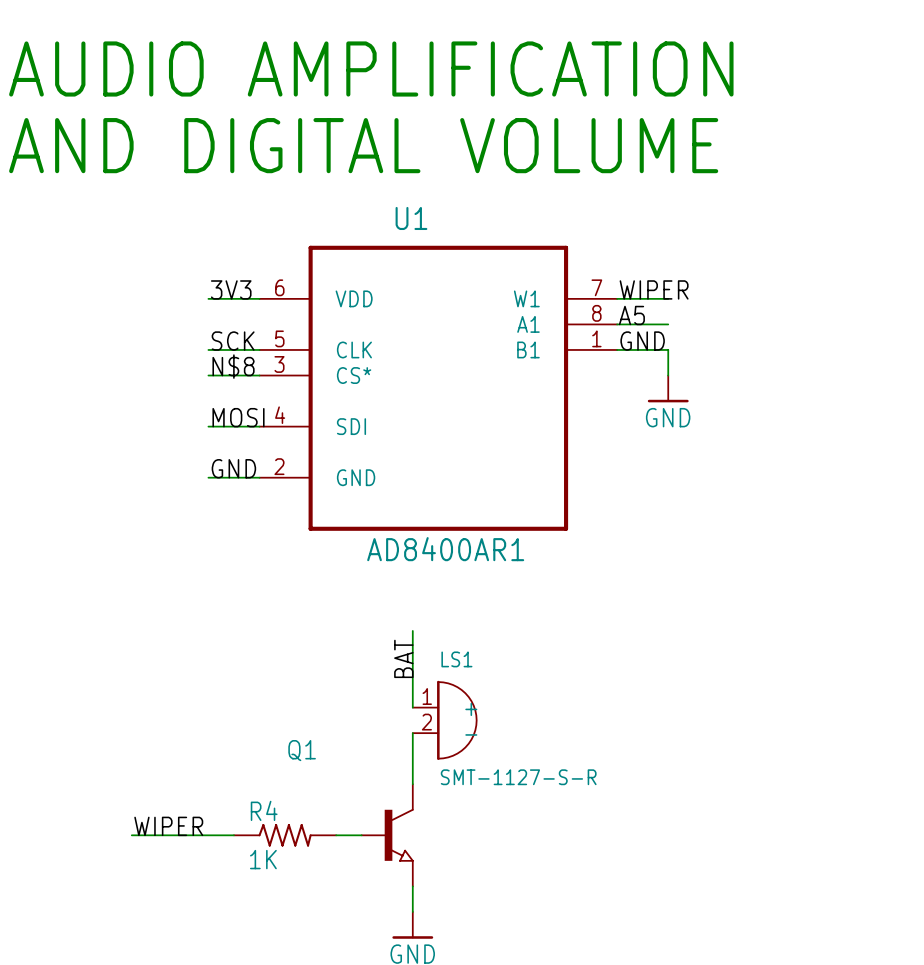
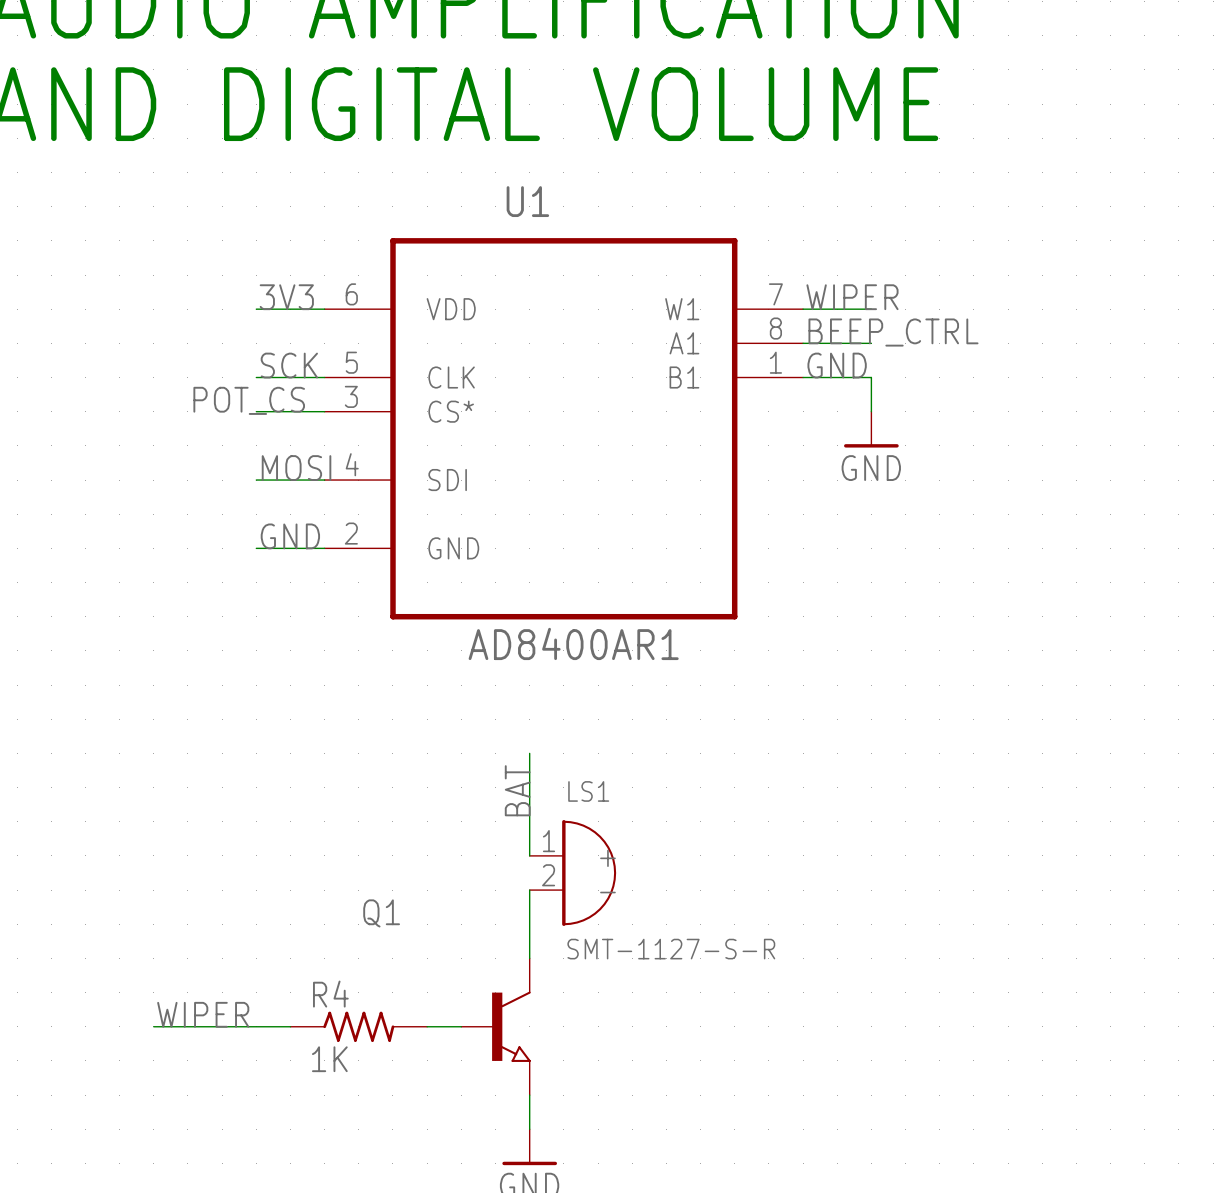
label: A5 (631, 315) -> BEEP_CTRL (893, 332)
label: N$8 (233, 366) -> none
label: none -> POT_CS (249, 400)

